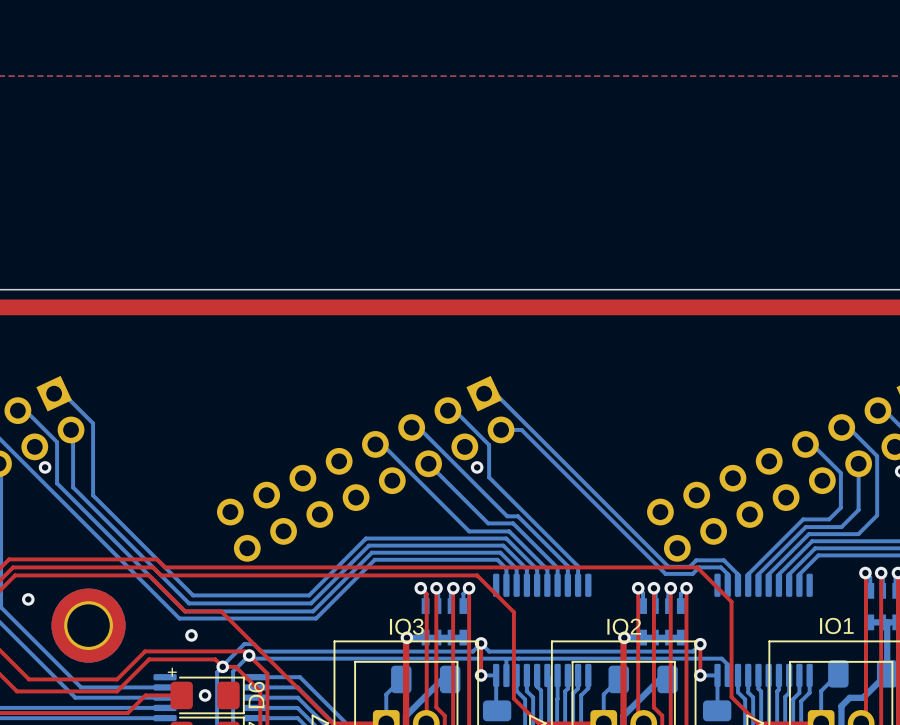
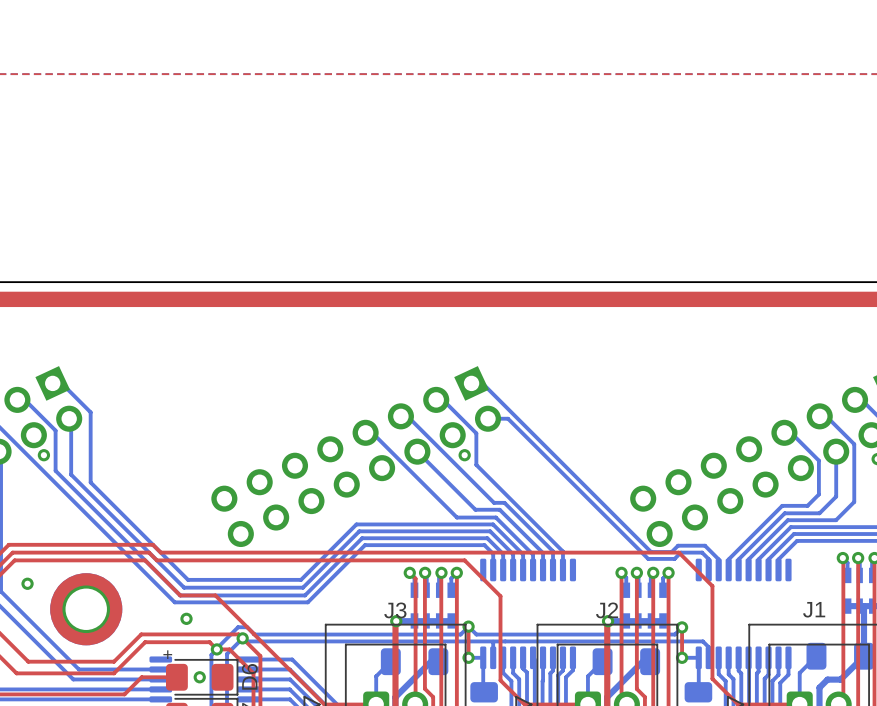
IO1 name: IO1 (836, 625) -> J1 (814, 609)
IO3 name: IO3 (406, 626) -> J3 (395, 610)
IO2 name: IO2 (624, 626) -> J2 (607, 610)

